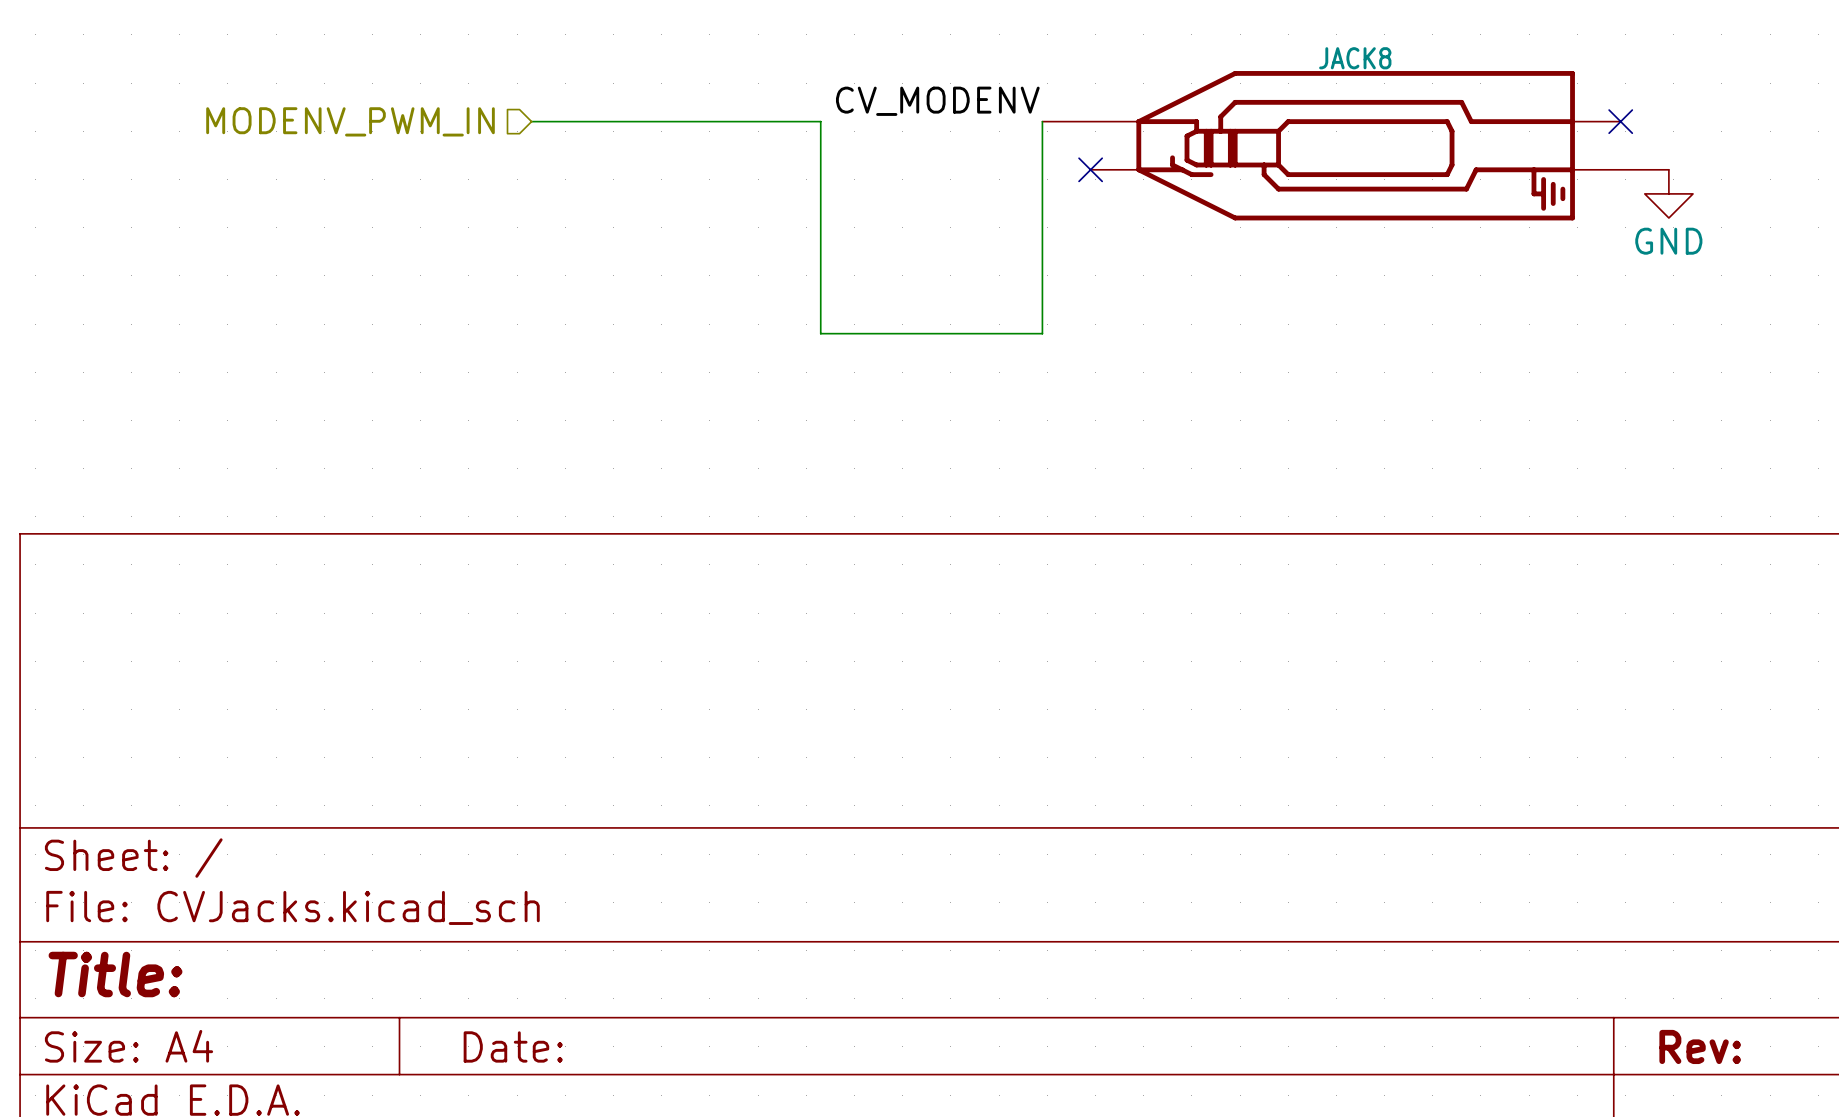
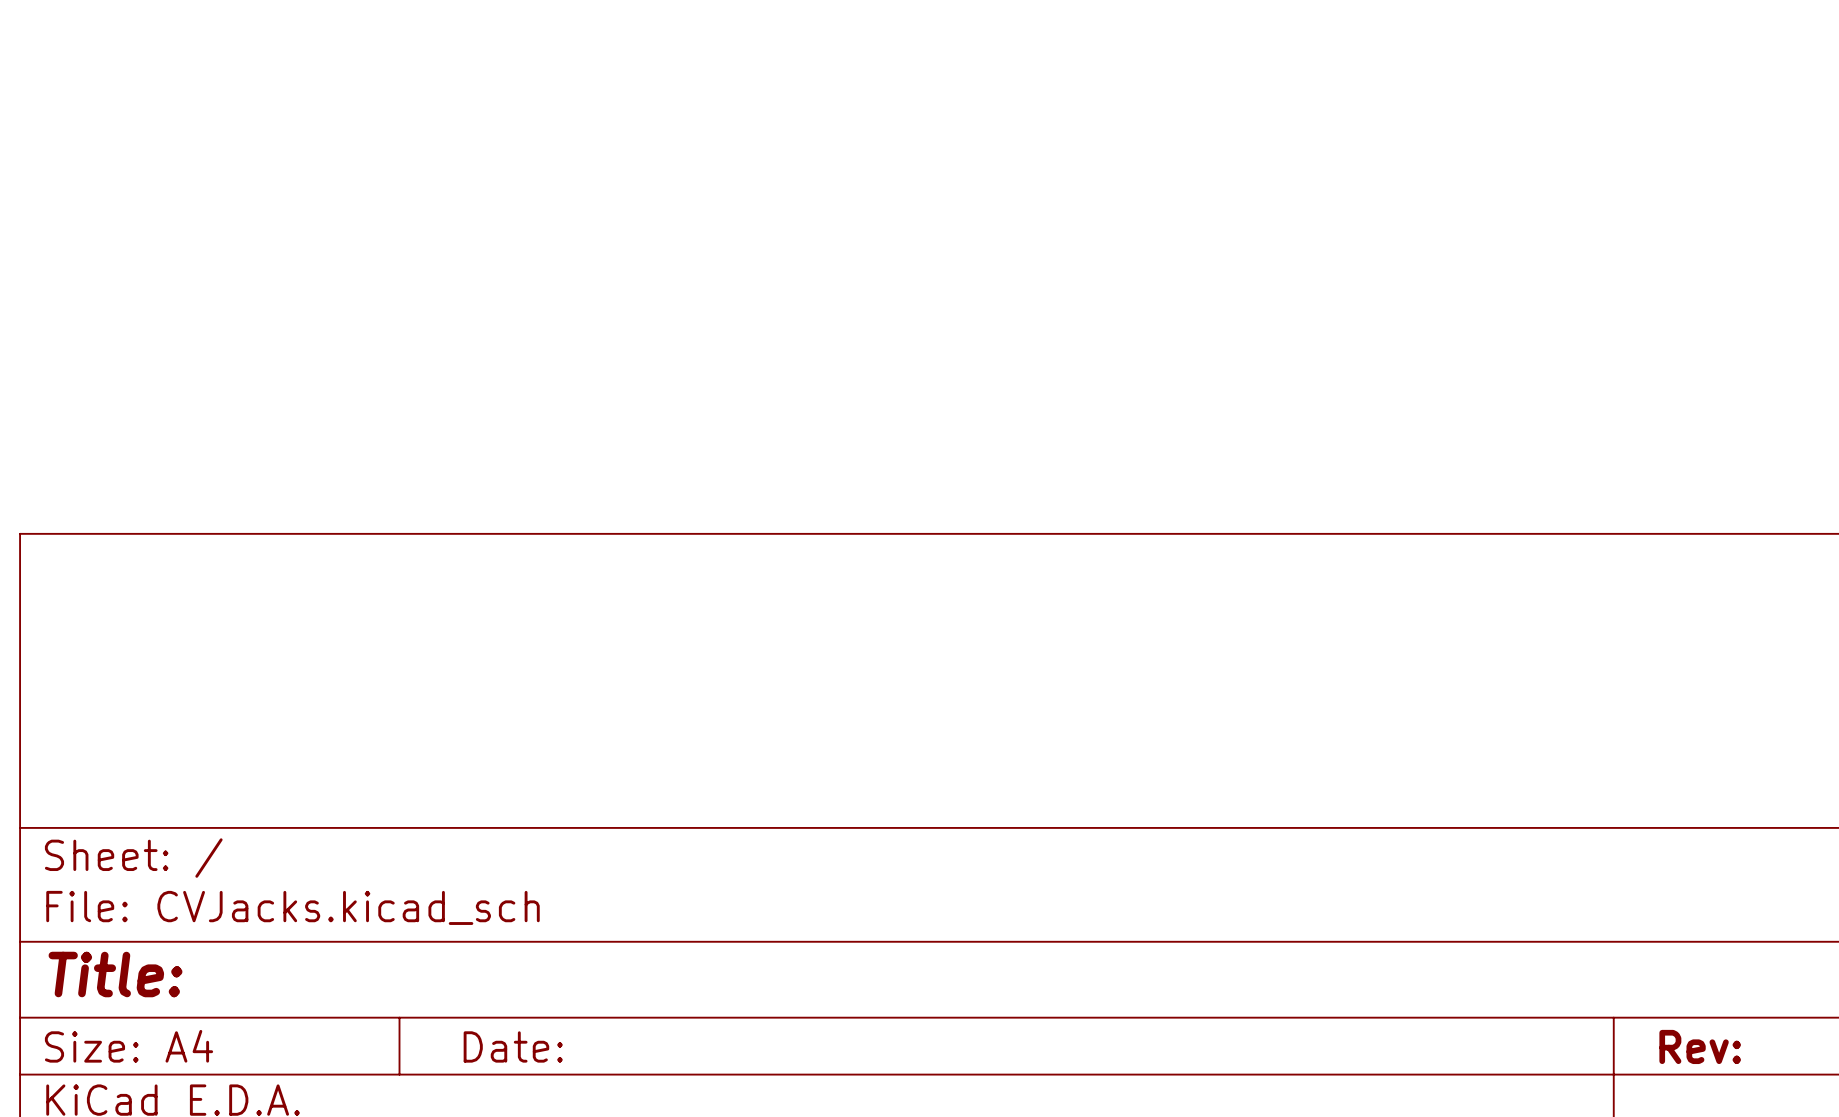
label: CV_MODENV (937, 101) -> none
hierarchical label: MODENV_PWM_IN (350, 121) -> none
wire: (531, 121) (820, 121) (820, 333) (1042, 333) (1042, 121) -> none
no-connect mark: (1620, 121) -> none
JACK8: (1355, 145) -> none
no-connect mark: (1090, 169) -> none
power symbol: GND (1668, 193) -> none

